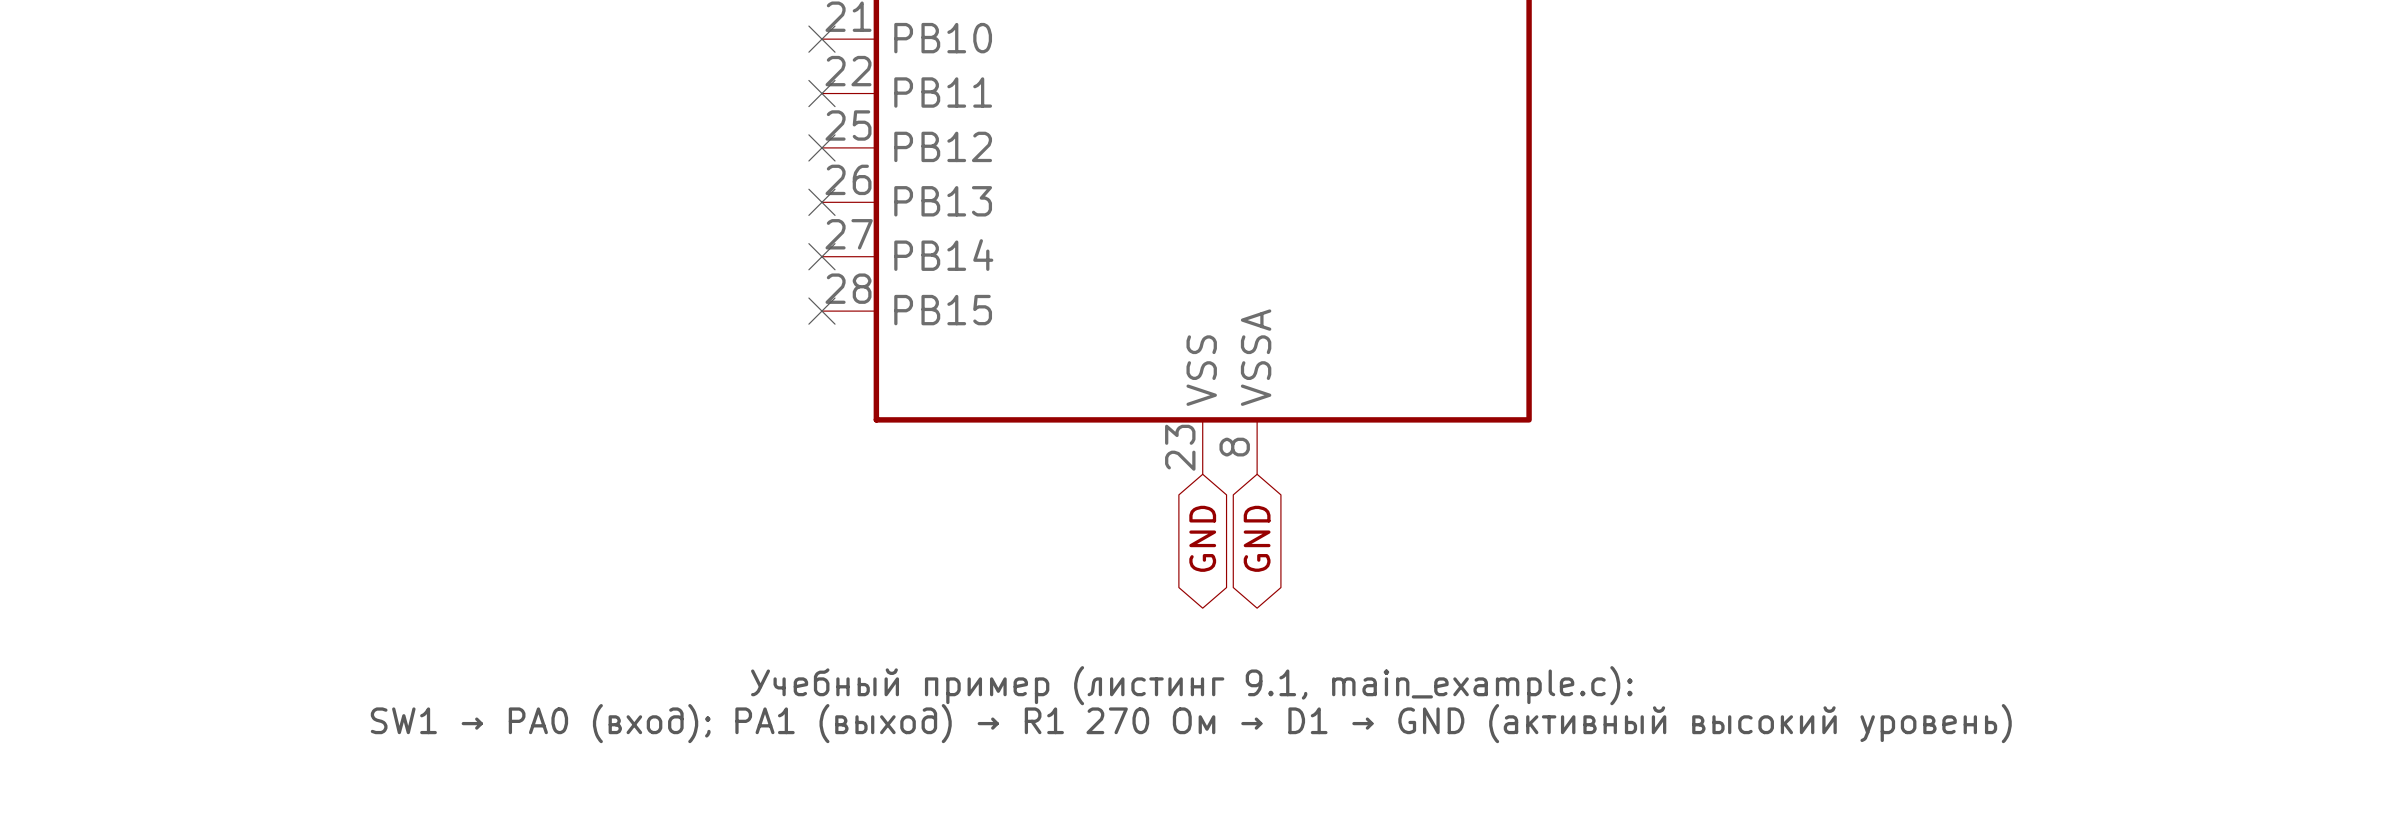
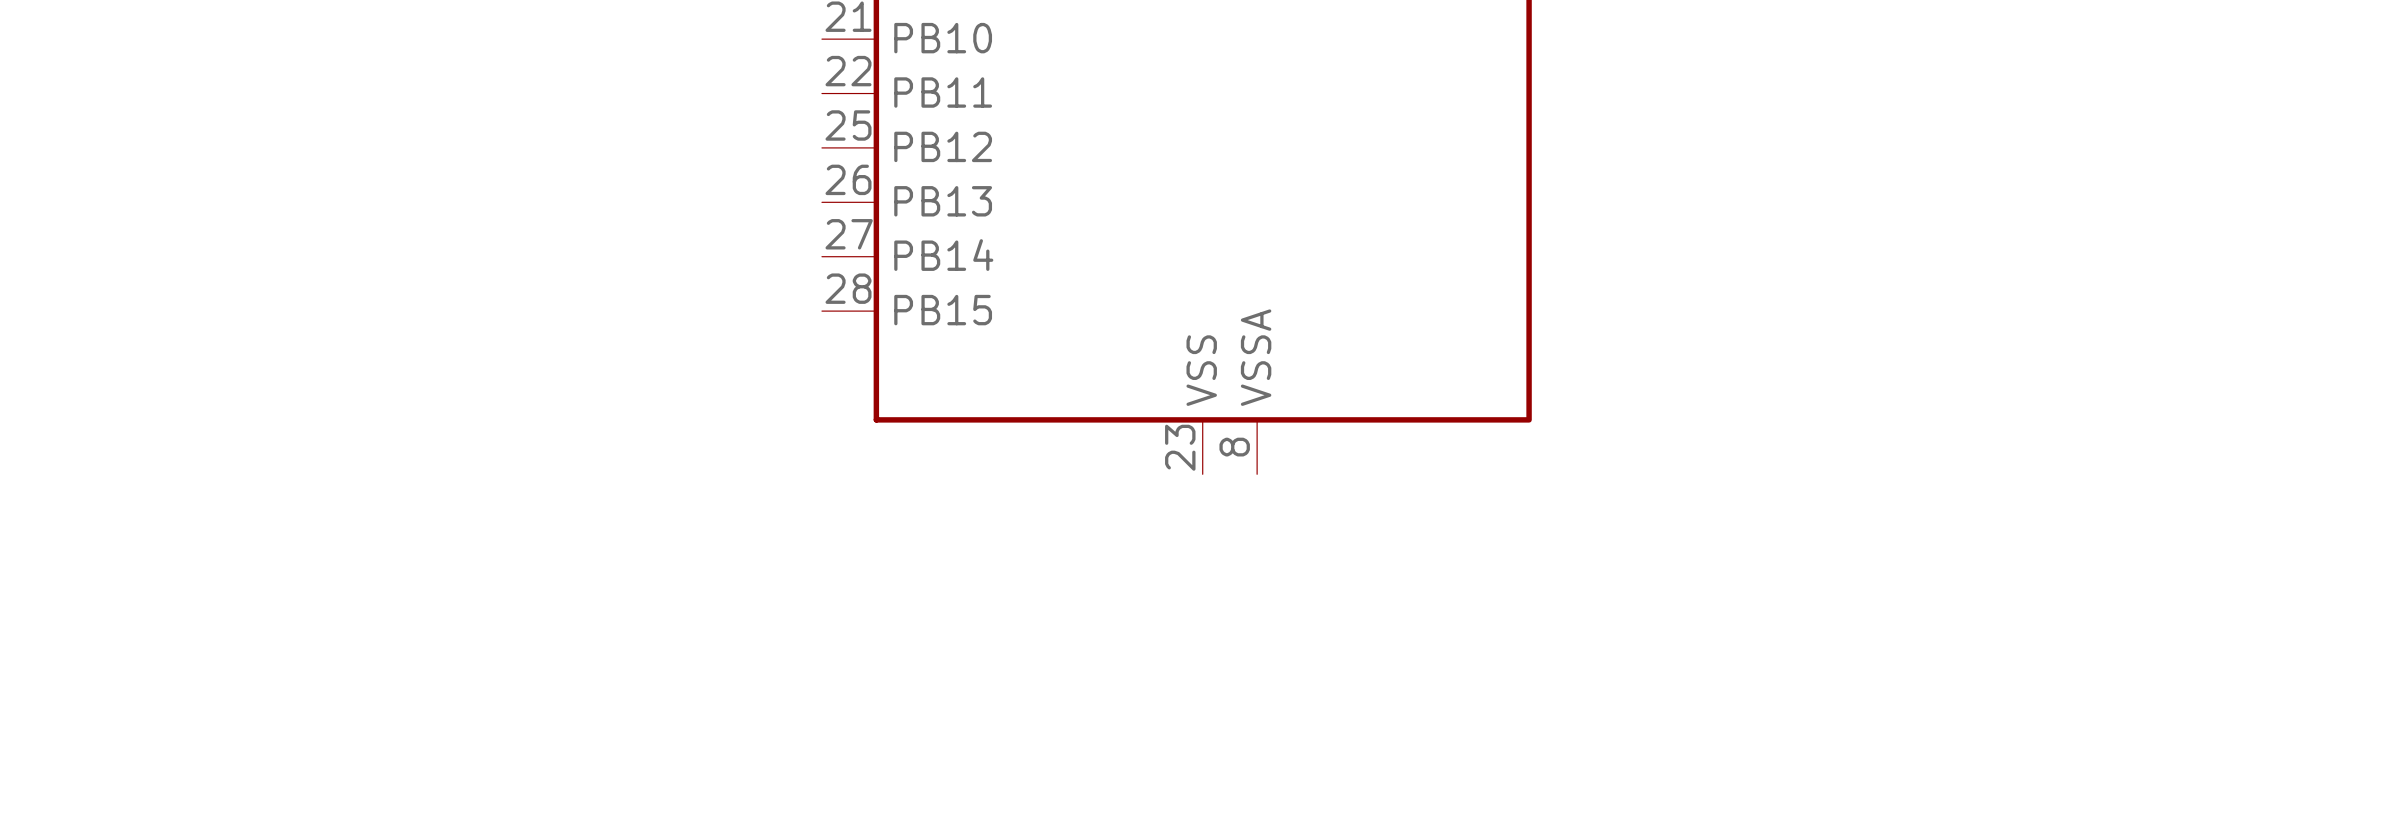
no-connect mark: (821, 39) -> none
no-connect mark: (821, 93) -> none
no-connect mark: (821, 147) -> none
no-connect mark: (821, 202) -> none
no-connect mark: (821, 256) -> none
no-connect mark: (821, 311) -> none
global label: GND (1202, 538) -> none
global label: GND (1257, 538) -> none
text: Учебный пример (листинг 9.1, main_example.c): (1191, 685) -> none
text: SW1 → PA0 (вход); PA1 (выход) → R1 270 Ом → D1 → GND (активный высокий уровень) (1191, 723) -> none

